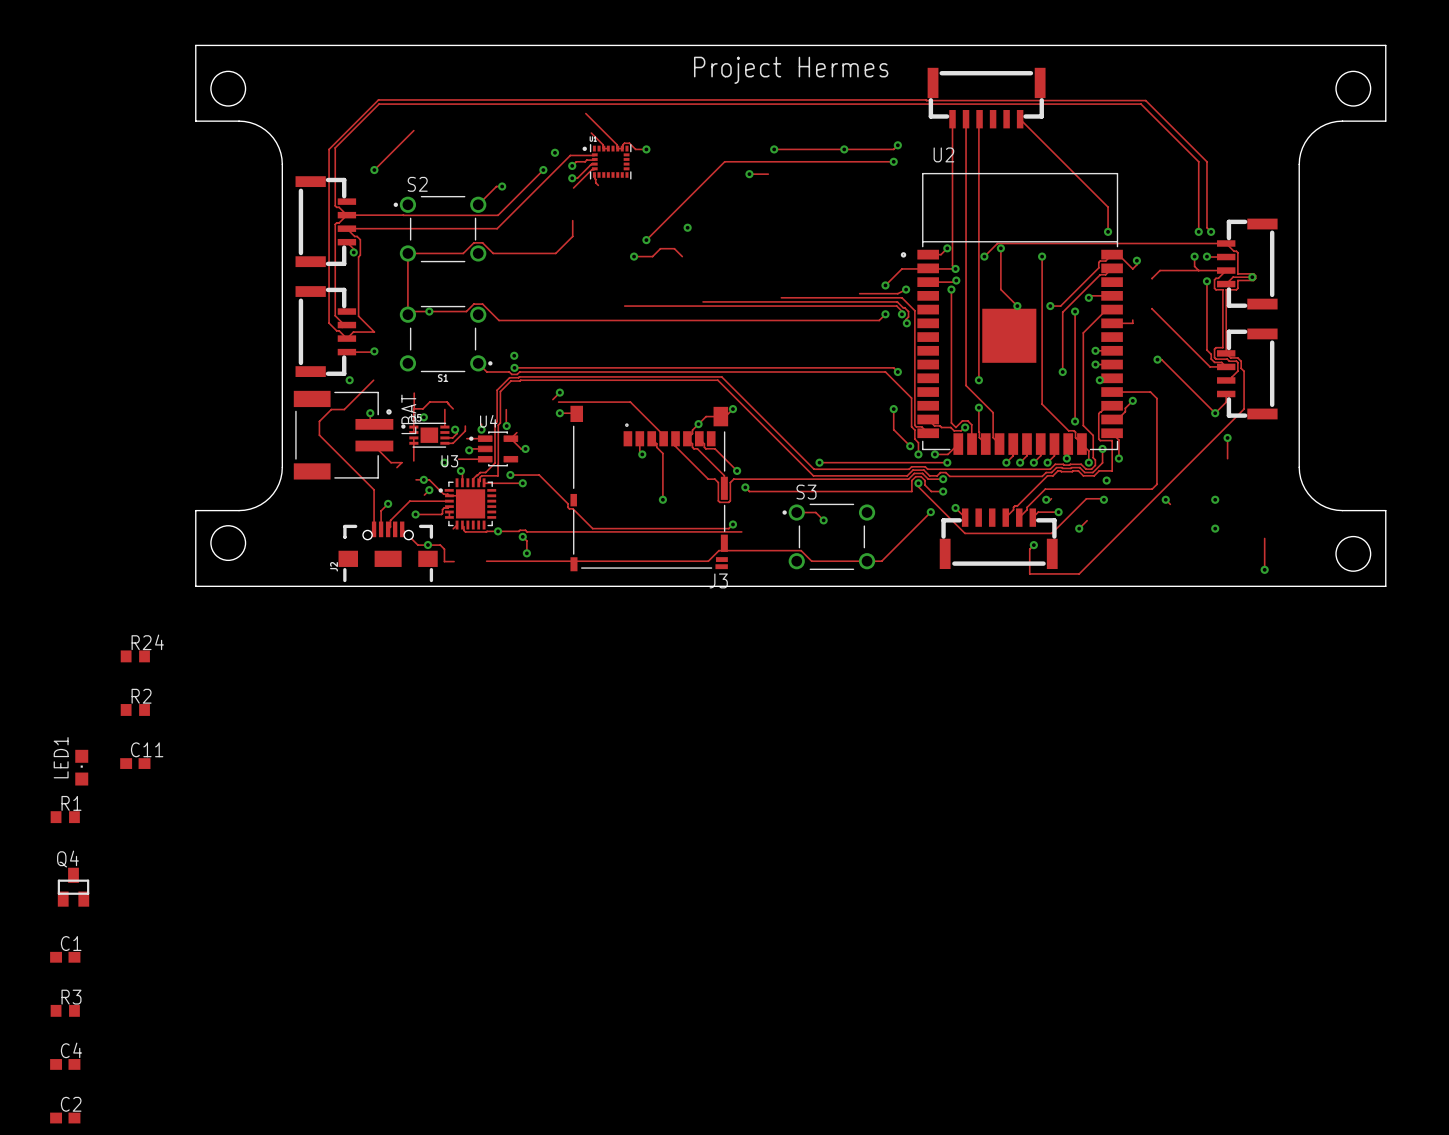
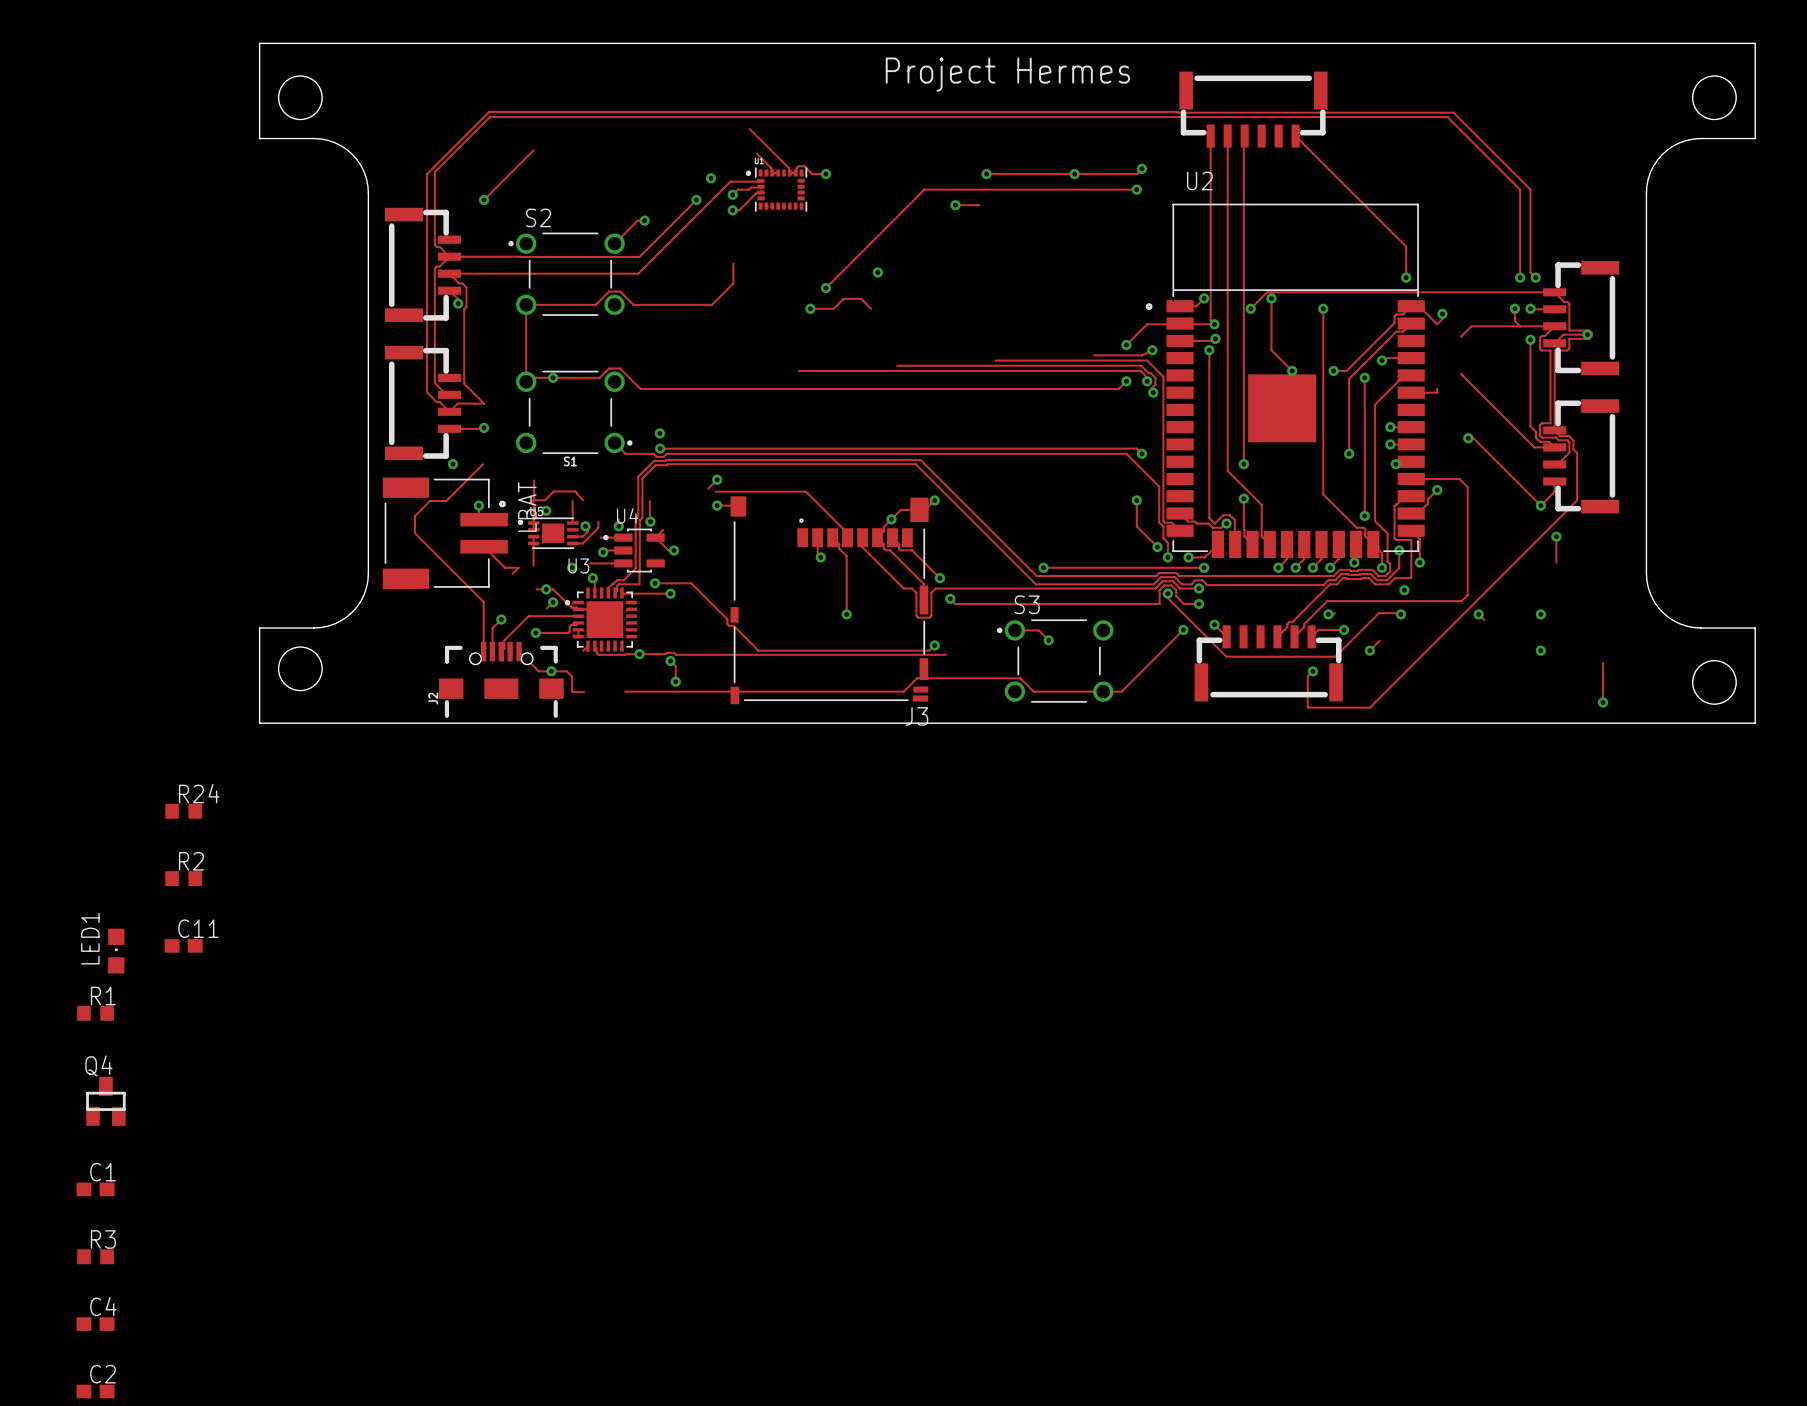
track: (594, 168) (573, 187) -> none
track: (594, 174) (598, 185) -> none

